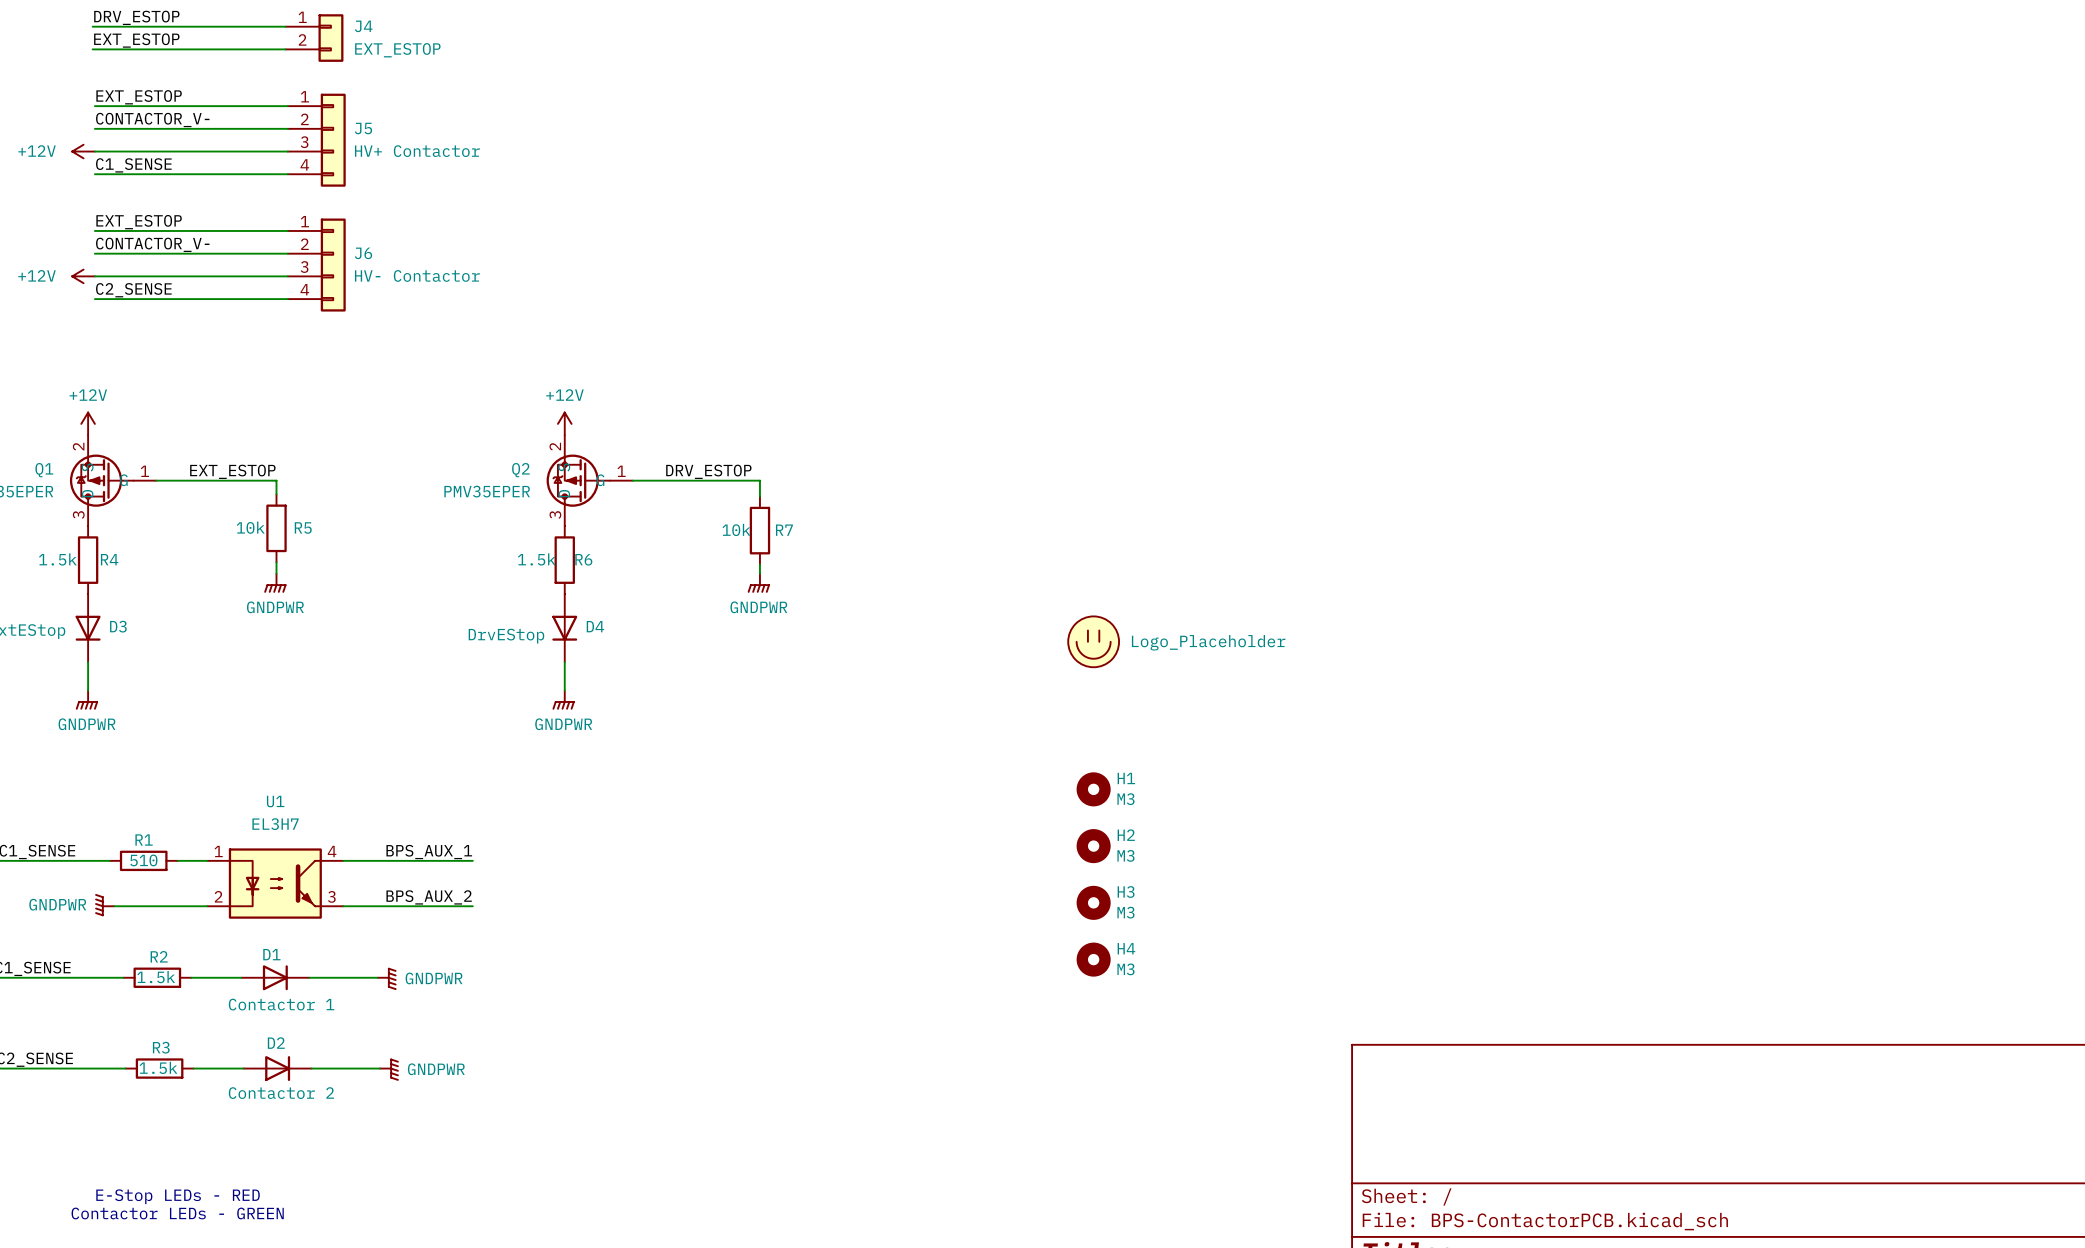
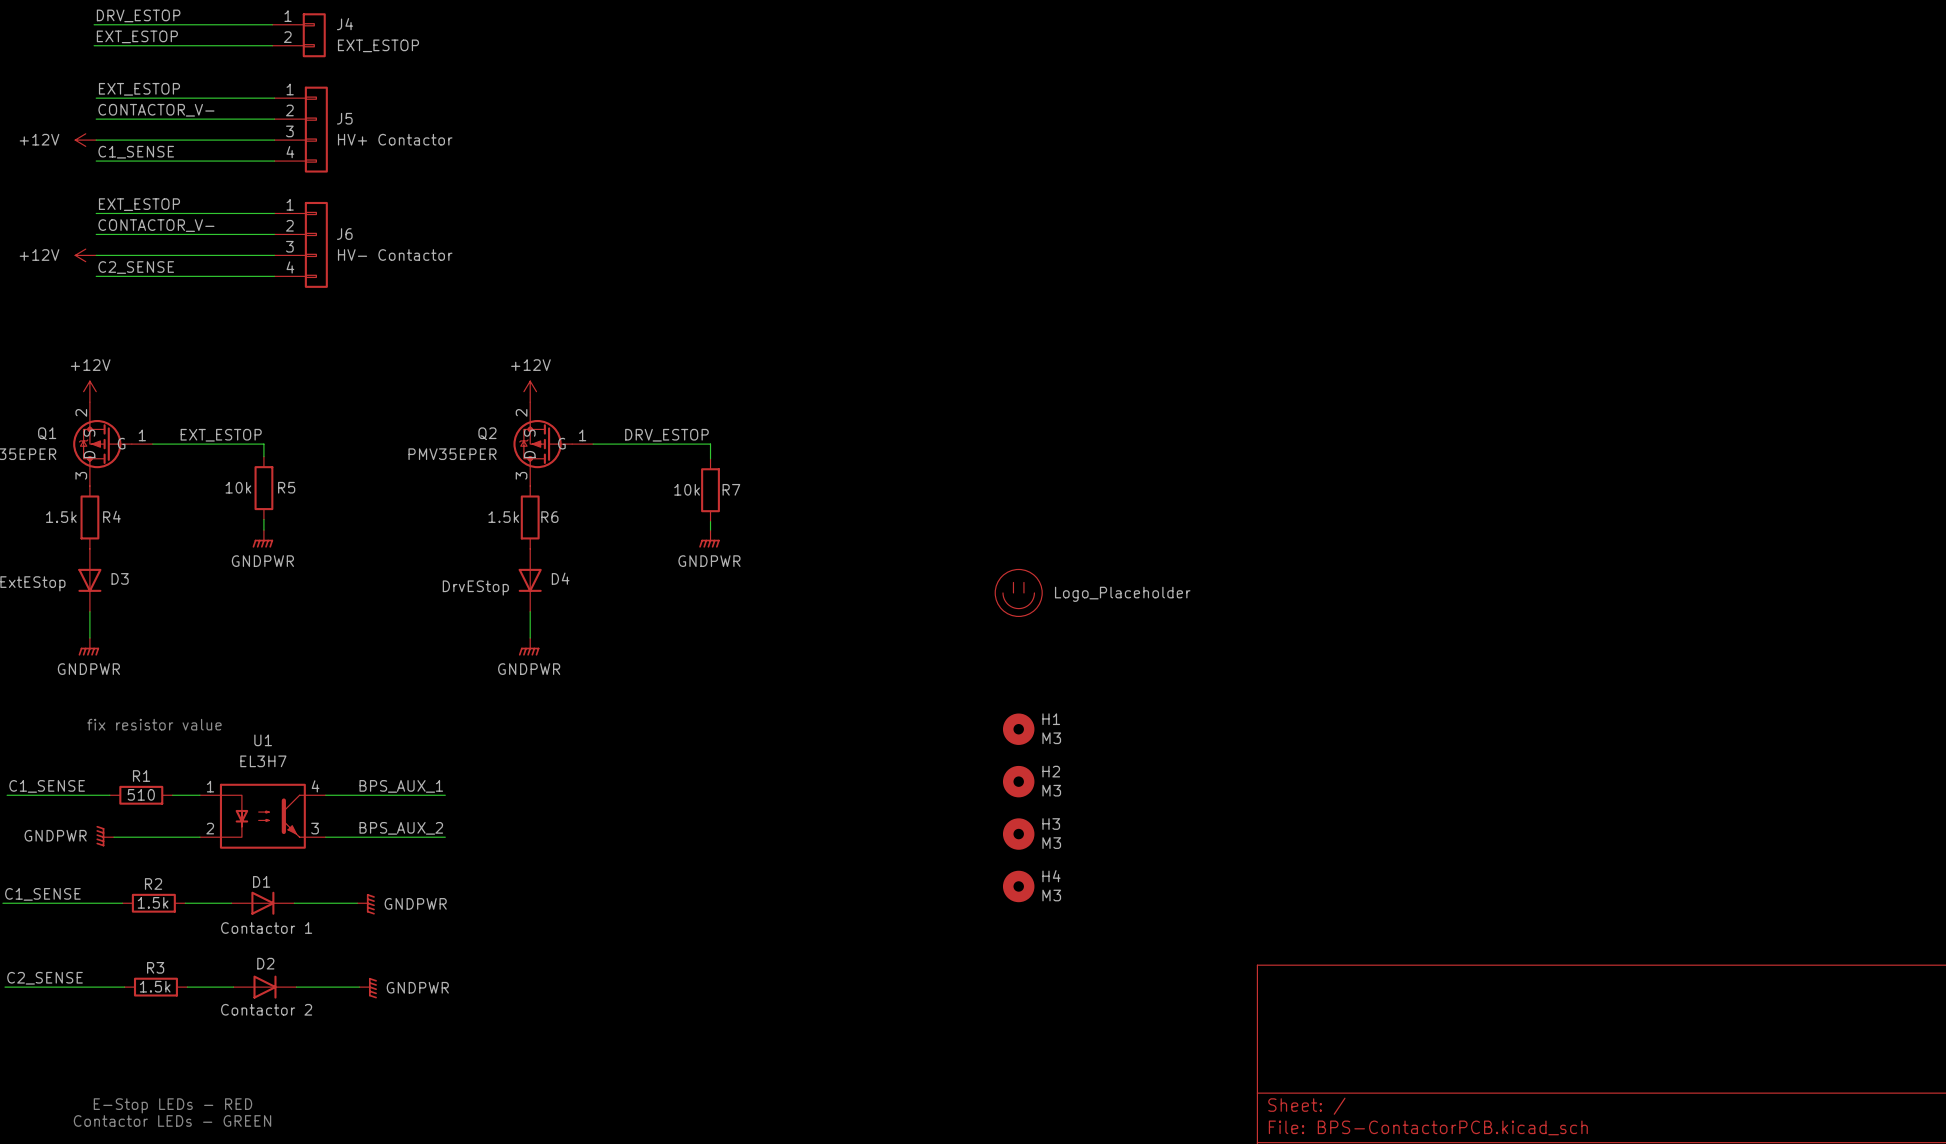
text: none -> fix resistor value (154, 724)

